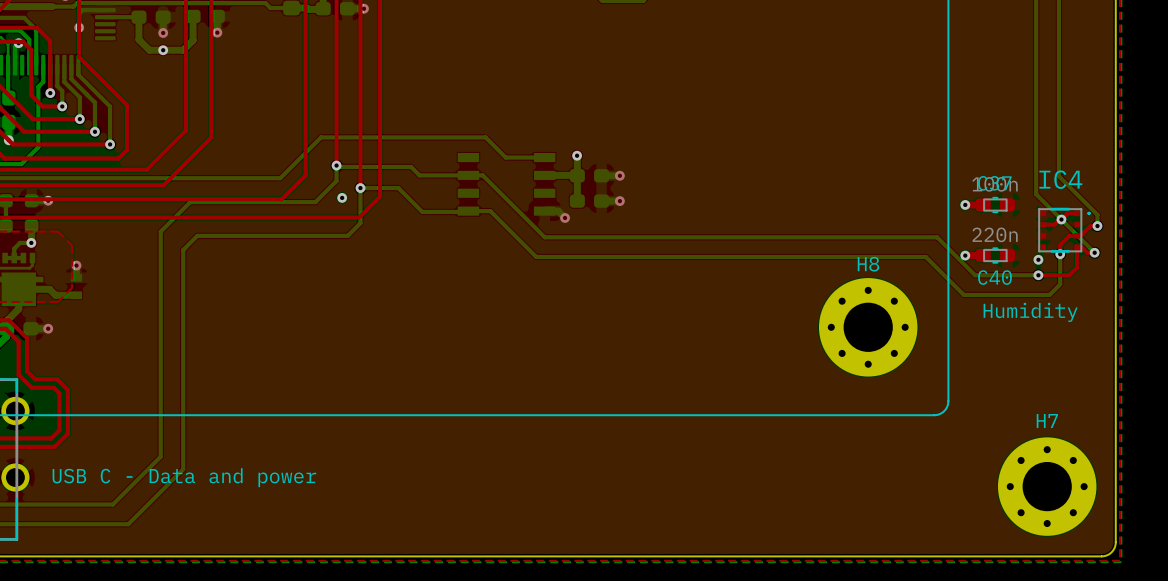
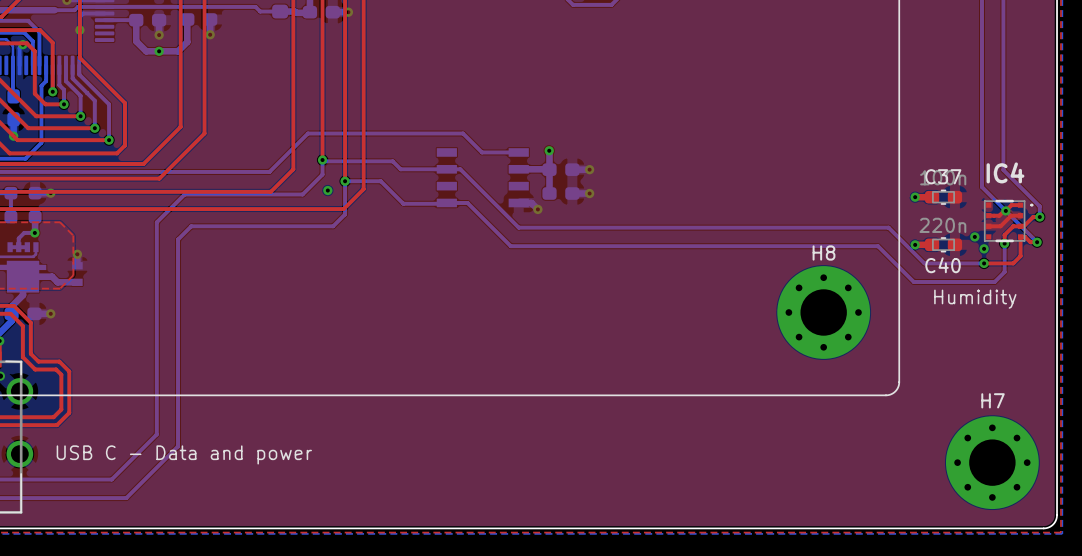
top track: none -> (1020, 215) (1011, 215) (1000, 226) (988, 226)
via: none -> (974, 236)

